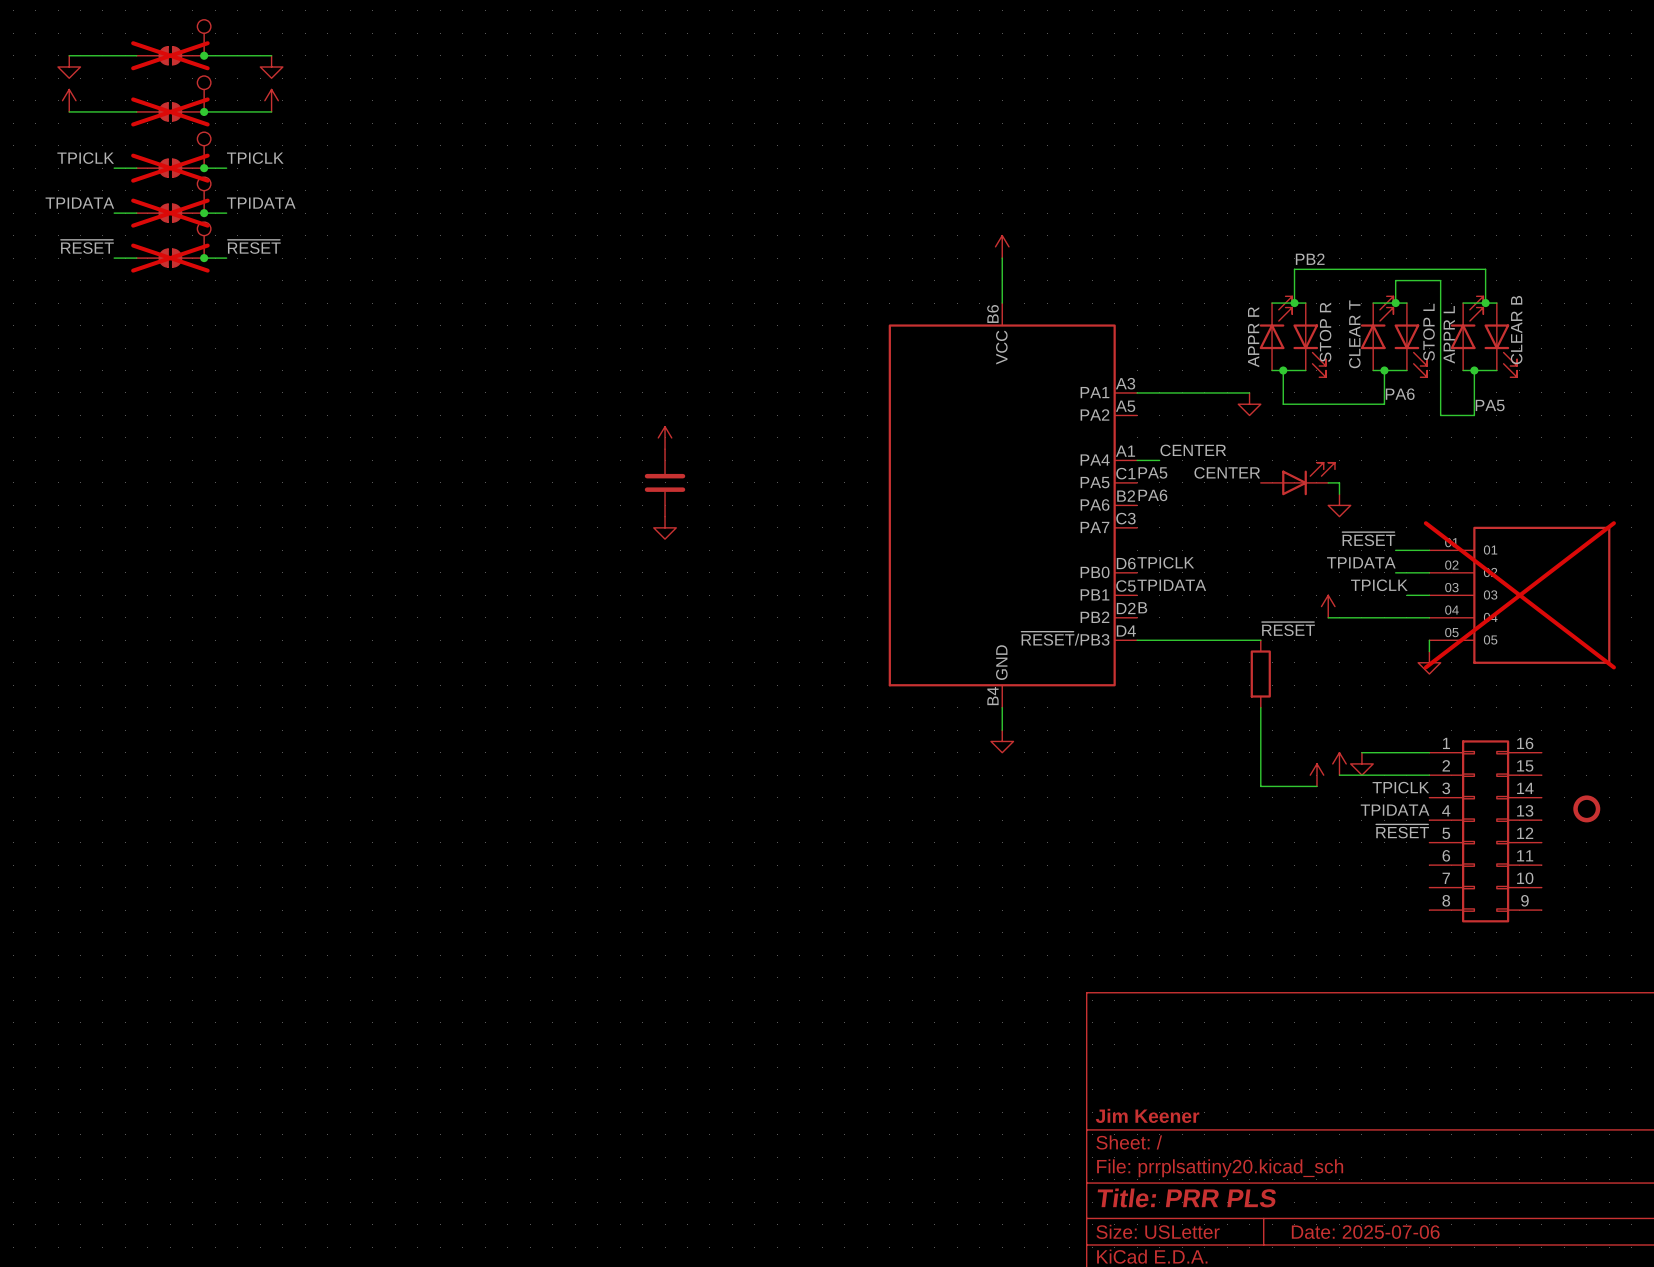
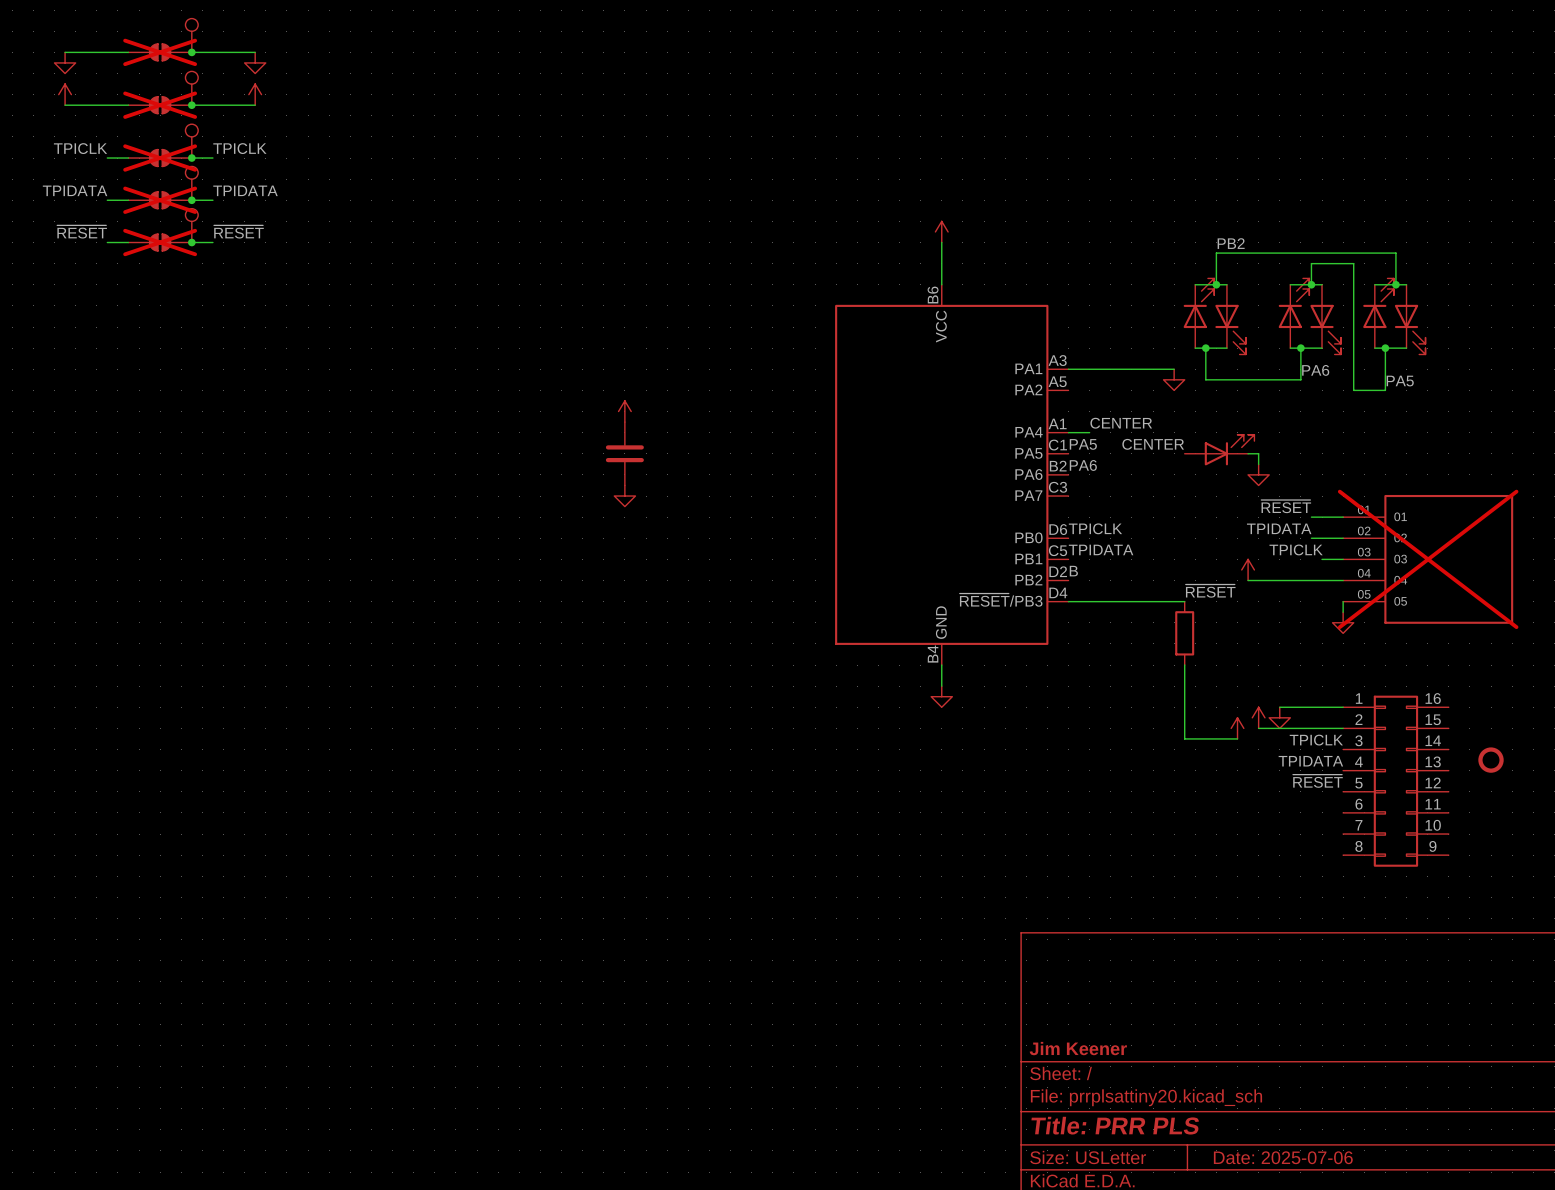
part text: CLEAR B (1516, 330) -> none
part text: STOP R (1325, 332) -> none
part text: STOP L (1428, 332) -> none
part text: CLEAR T (1354, 334) -> none
part text: APPR L (1449, 334) -> none
part text: APPR R (1253, 337) -> none

